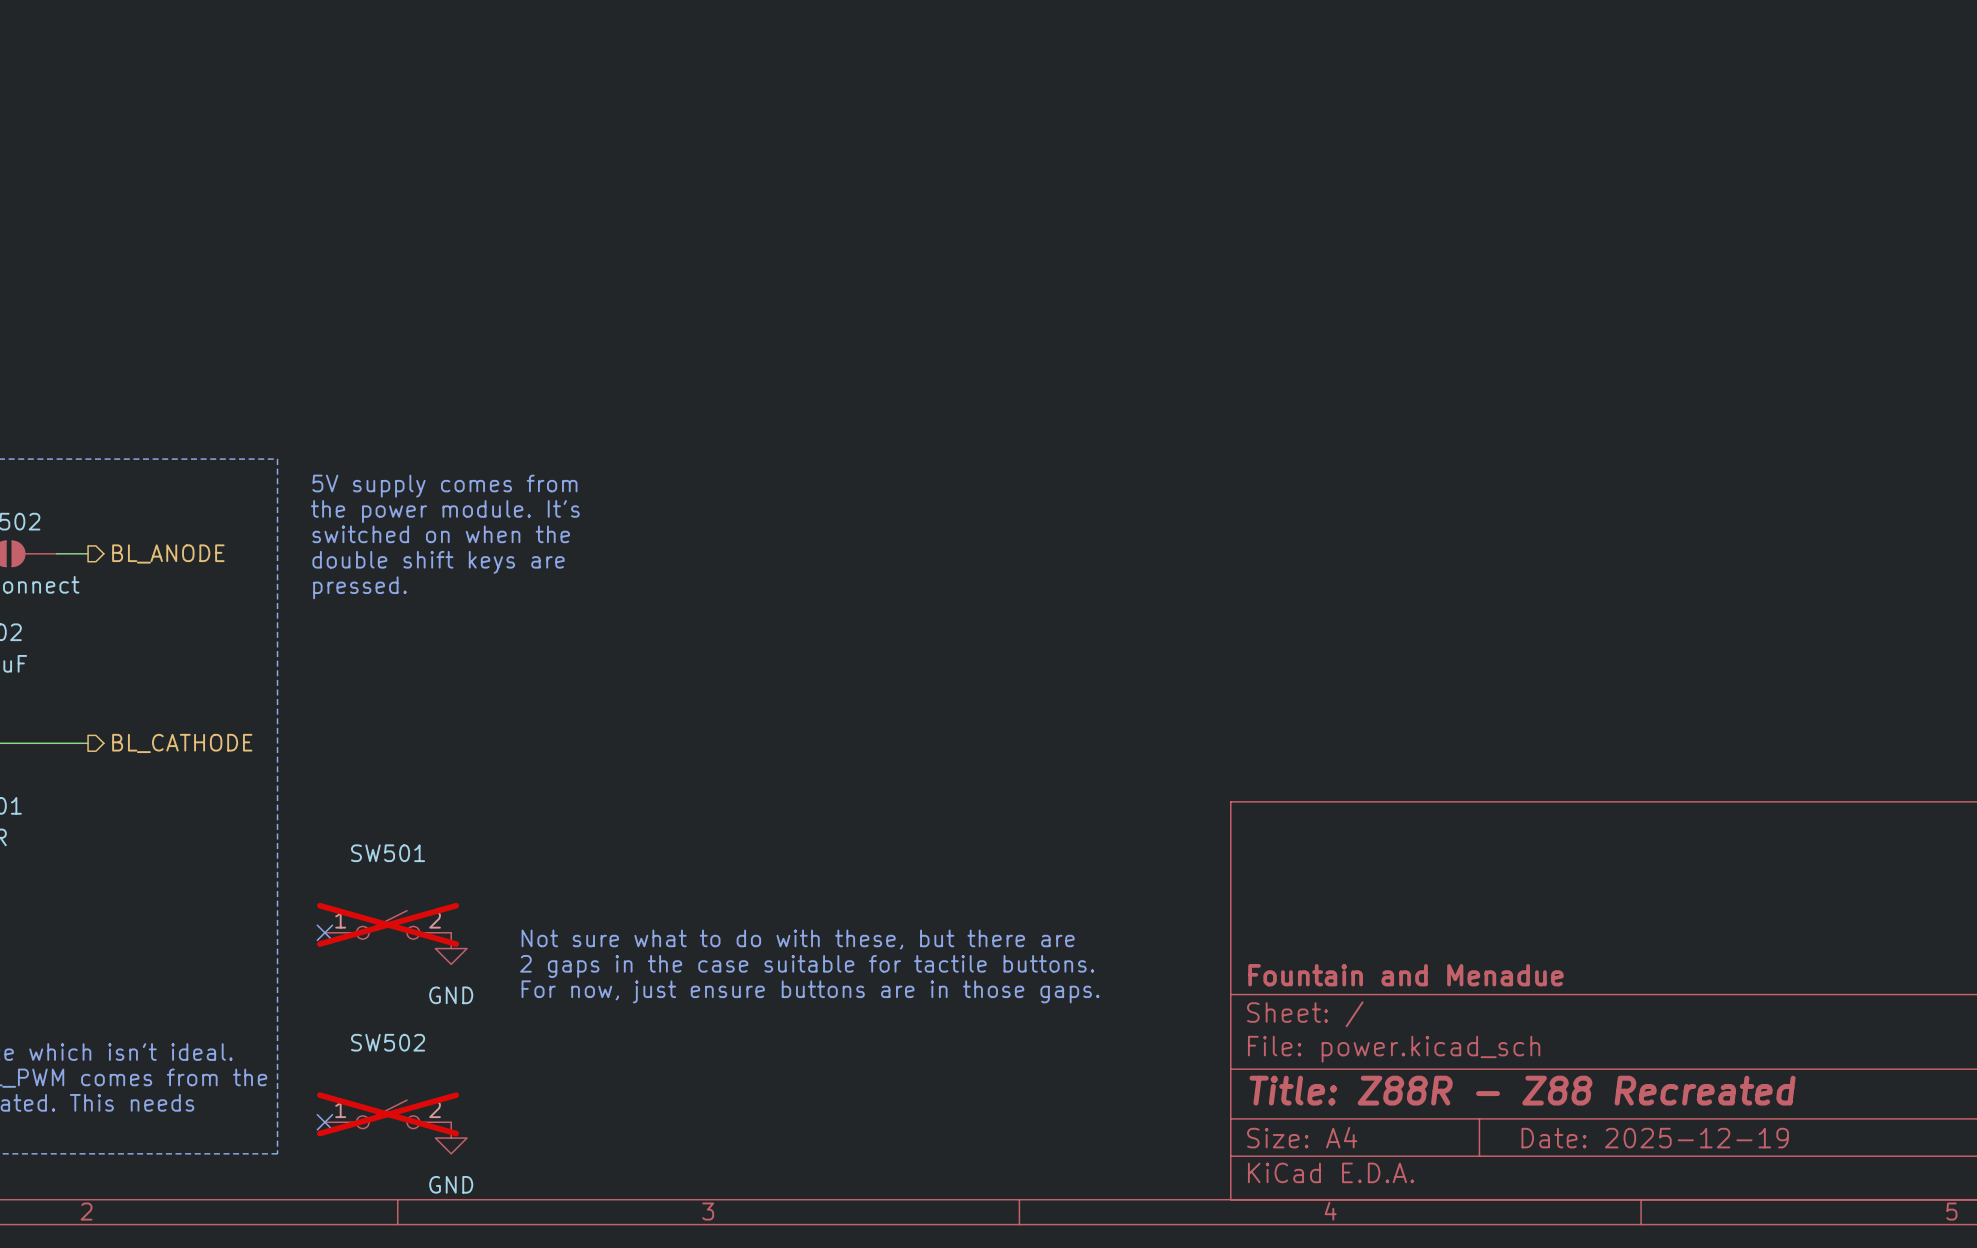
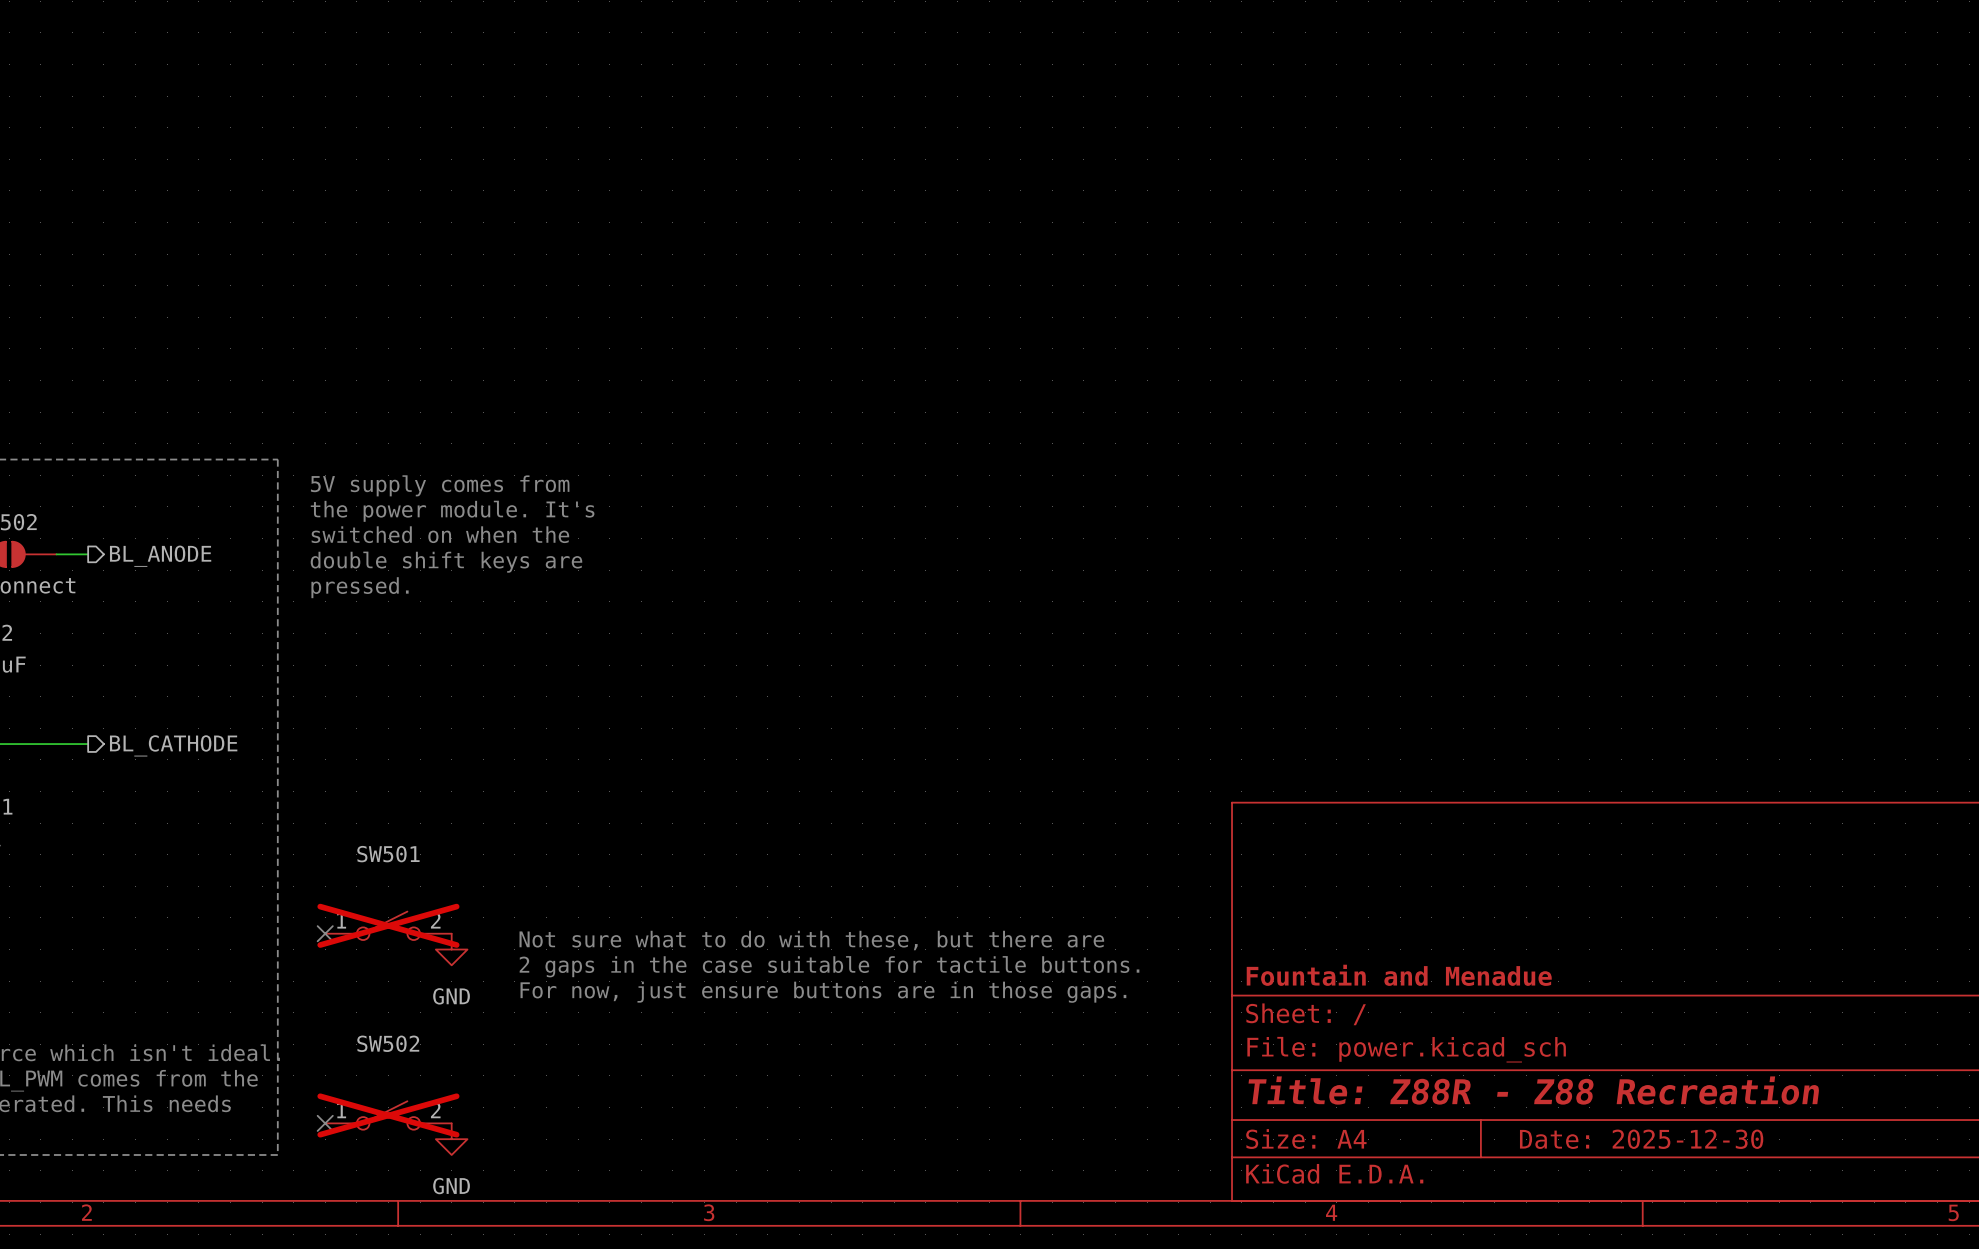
title block: Title: Z88R - Z88 Recreated (1522, 1090) -> Title: Z88R - Z88 Recreation (1533, 1090)
title block: Date: 2025-12-19 (1655, 1138) -> Date: 2025-12-30 (1641, 1139)

